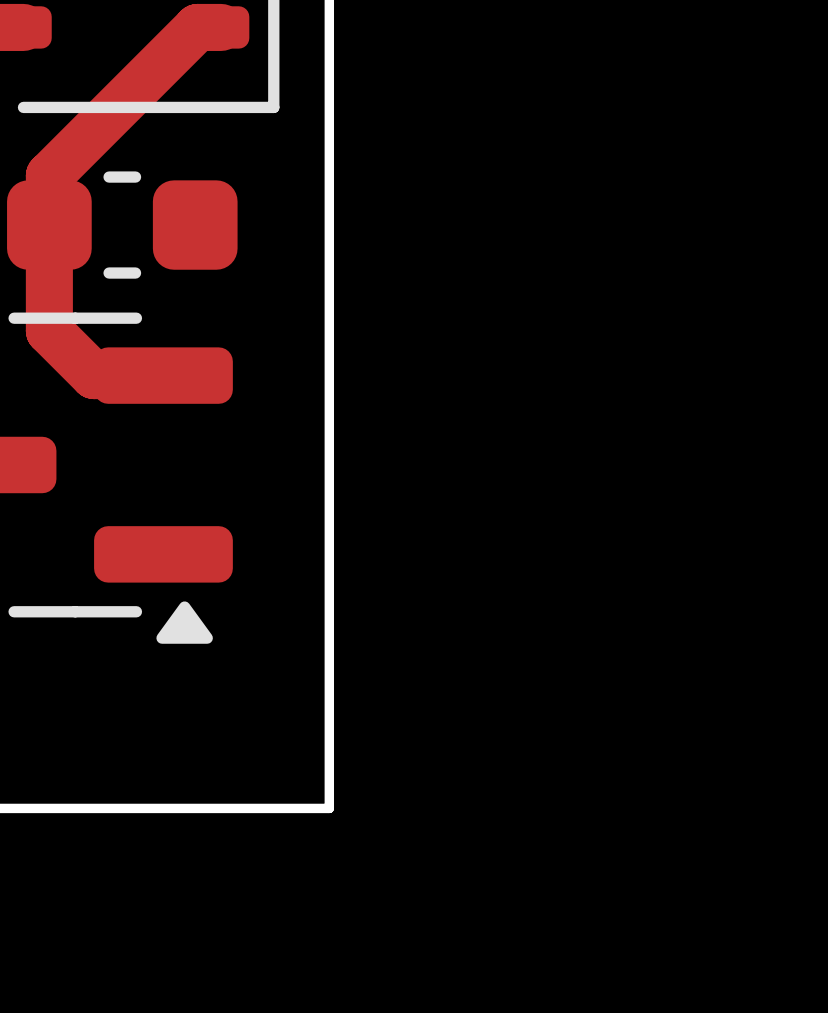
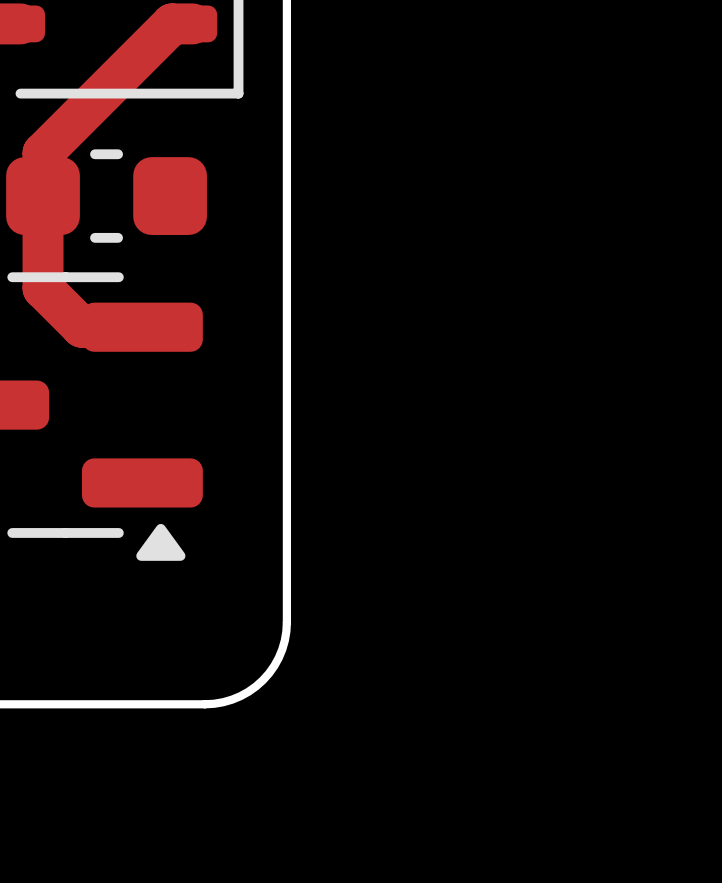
board edge: (329, 714) (329, 808) (235, 808) -> (286, 622) (284, 640) (278, 657) (262, 680) (240, 696) (223, 702) (204, 704)

